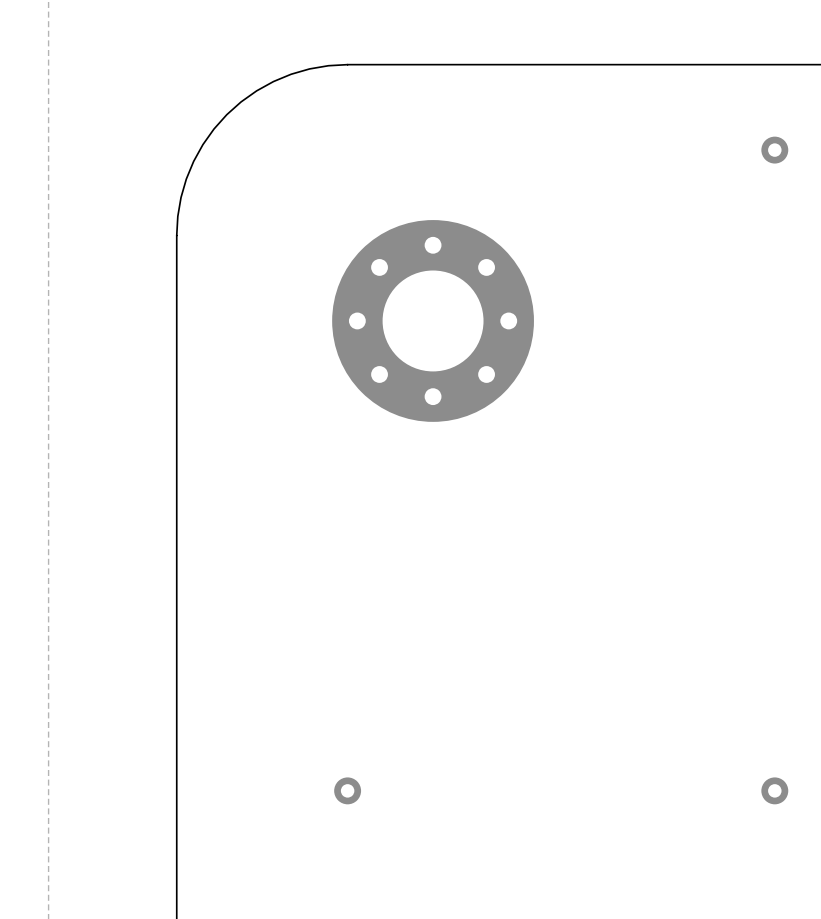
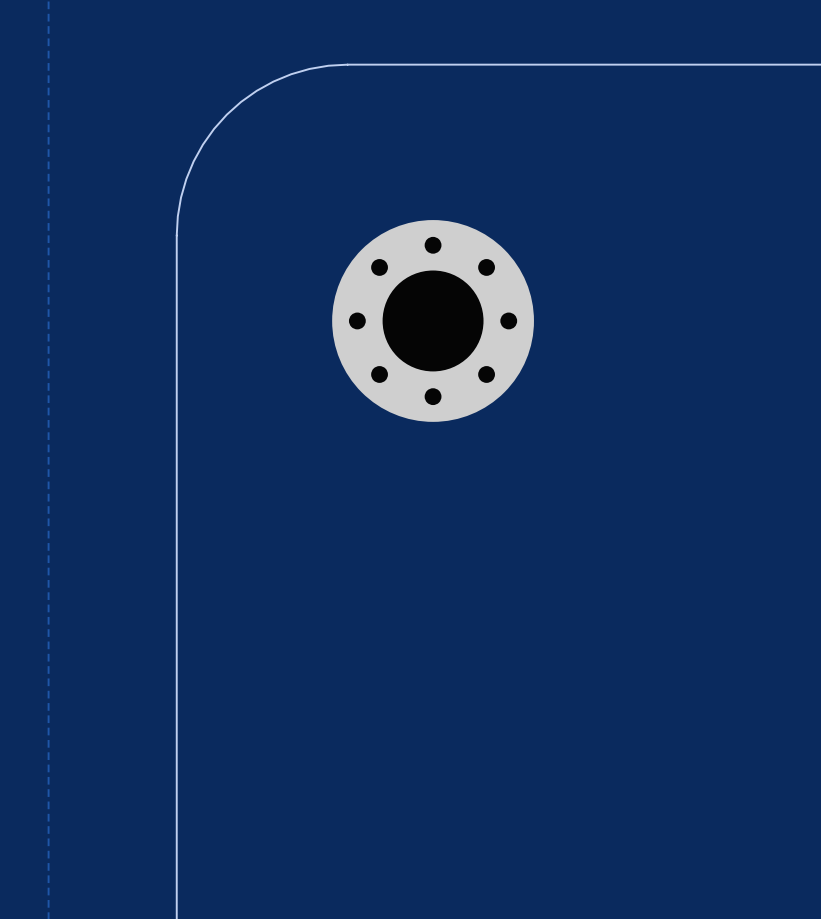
via: (774, 150) -> none
via: (347, 790) -> none
via: (774, 790) -> none

